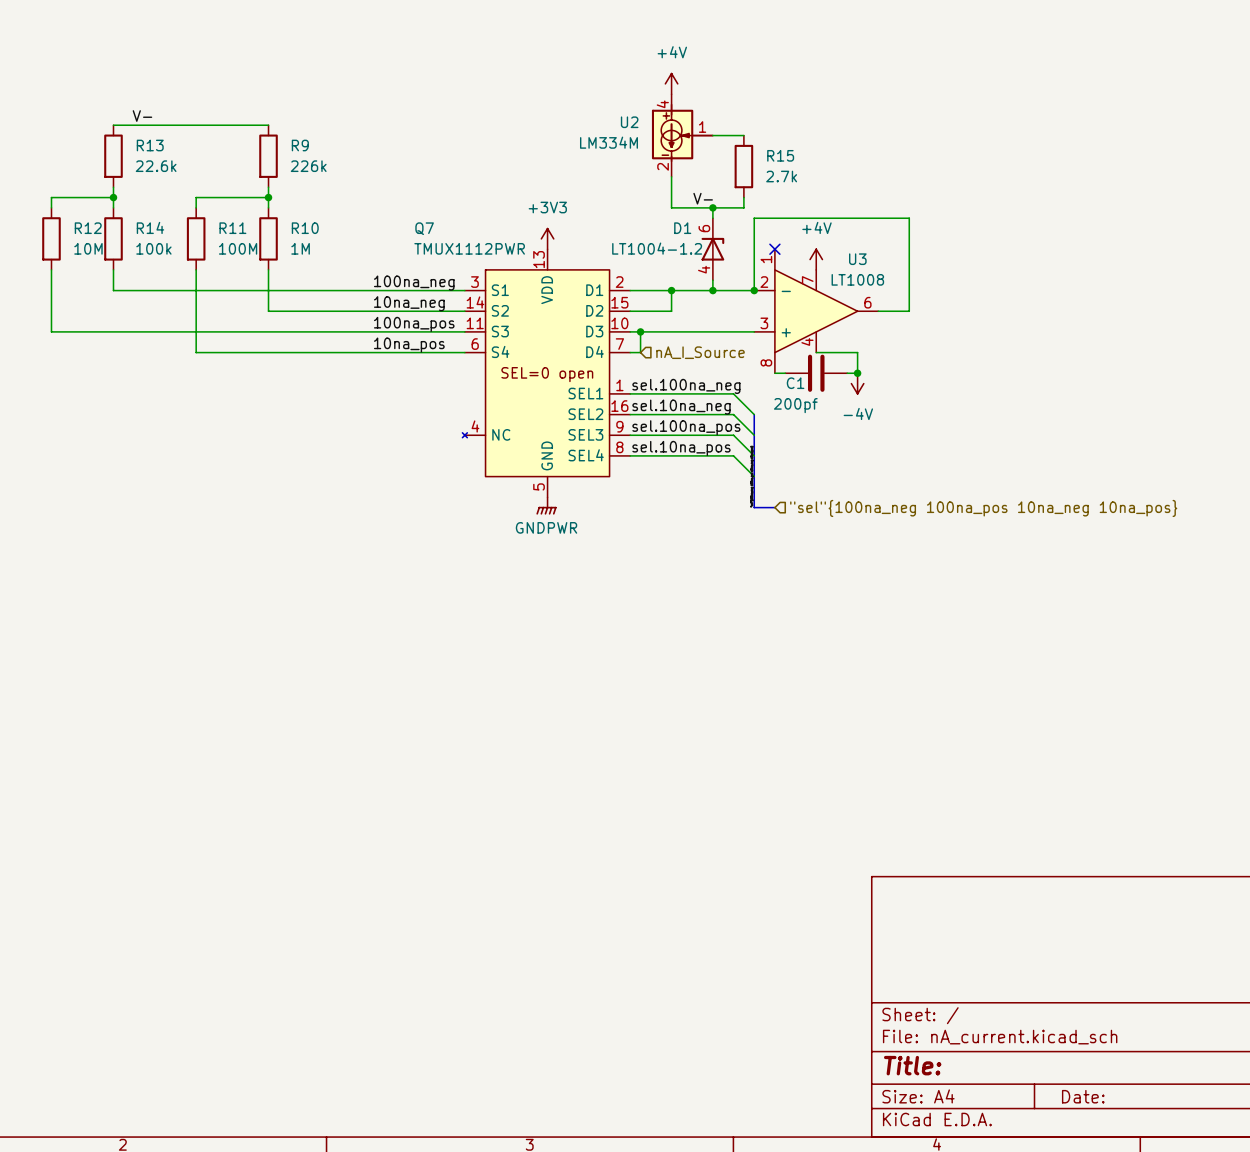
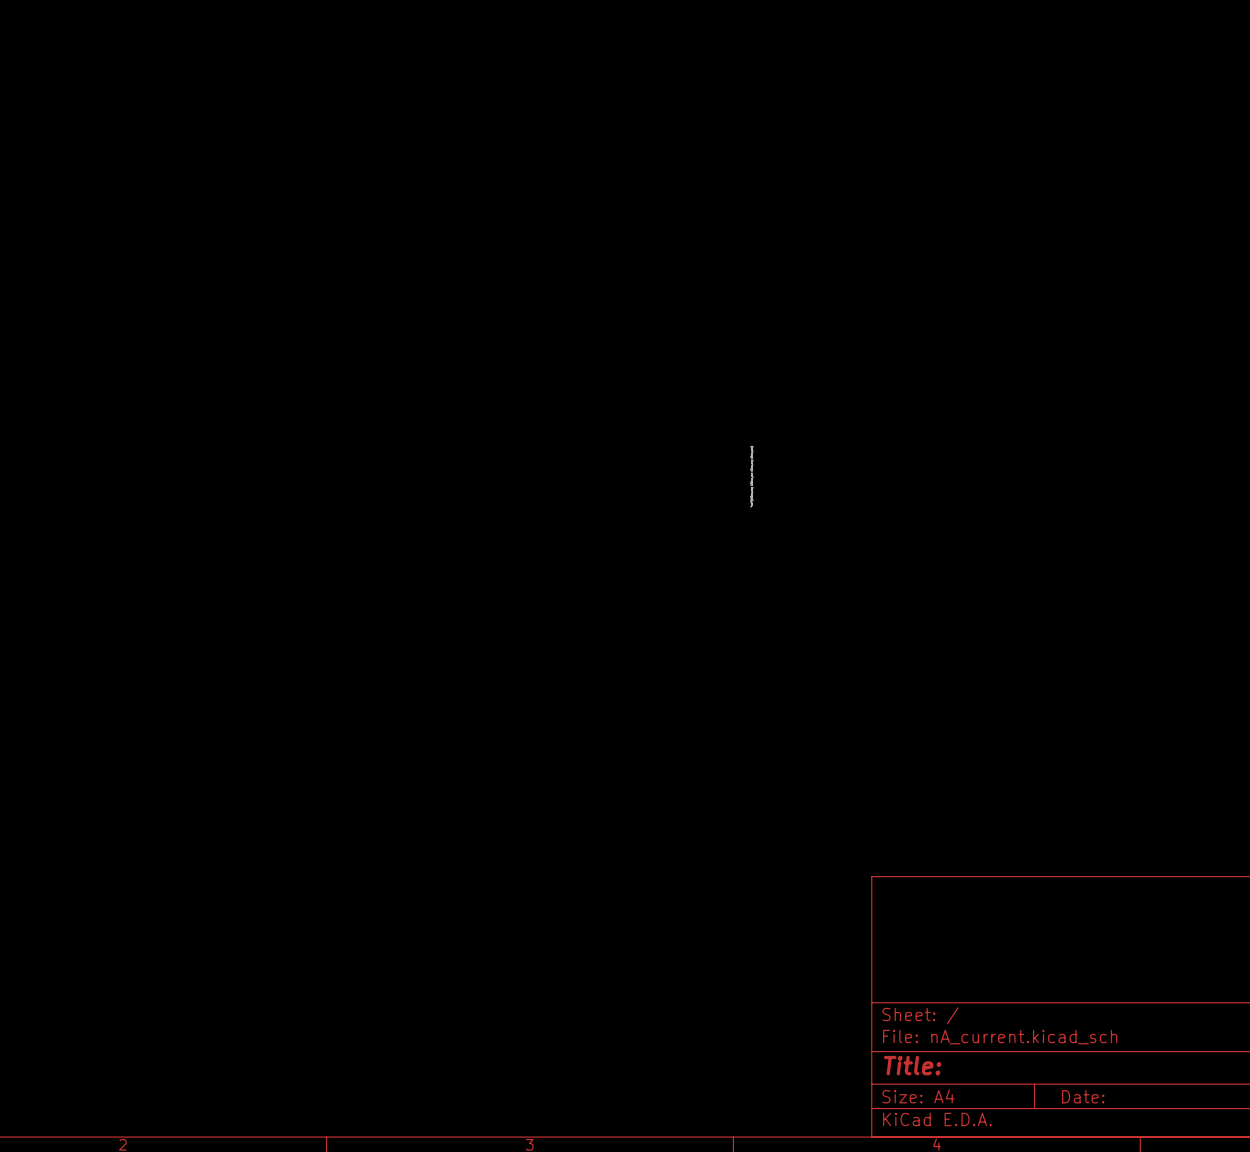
power symbol: +4V (671, 83) -> none
label: V- (142, 116) -> none
wire: (113, 125) (268, 125) -> none
U2: LM334M (682, 135) -> none
wire: (712, 135) (743, 135) -> none
R13: 22.6k (113, 156) -> none
R9: 226k (268, 156) -> none
R15: 2.7k (743, 166) -> none
wire: (671, 176) (671, 207) (743, 207) (743, 197) -> none
wire: (113, 187) (113, 207) -> none
wire: (268, 187) (268, 207) -> none
wire: (113, 197) (51, 197) (51, 207) -> none
junction: (113, 197) -> none
wire: (268, 197) (196, 197) (196, 207) -> none
junction: (268, 197) -> none
label: V- (703, 198) -> none
wire: (712, 207) (712, 218) -> none
junction: (712, 207) -> none
R12: 10M (51, 238) -> none
R14: 100k (113, 238) -> none
R11: 100M (196, 238) -> none
R10: 1M (268, 238) -> none
power symbol: +3V3 (547, 238) -> none
D1: LT1004-1.2 (712, 249) -> none
no-connect mark: (774, 249) -> none
power symbol: +4V (816, 259) -> none
wire: (51, 269) (51, 331) (464, 331) -> none
wire: (113, 269) (113, 290) (464, 290) -> none
wire: (196, 269) (196, 352) (464, 352) -> none
wire: (268, 269) (268, 311) (464, 311) -> none
wire: (712, 280) (712, 290) -> none
label: 100na_neg (414, 283) -> none
wire: (630, 290) (754, 290) (754, 218) (909, 218) (909, 311) (878, 311) -> none
wire: (671, 290) (671, 311) (630, 311) -> none
junction: (671, 290) -> none
junction: (712, 290) -> none
junction: (754, 290) -> none
label: 10na_neg (409, 303) -> none
U3: LT1008 (816, 311) -> none
label: 100na_pos (414, 324) -> none
wire: (630, 331) (754, 331) -> none
wire: (640, 331) (640, 352) (630, 352) -> none
junction: (640, 331) -> none
label: 10na_pos (409, 345) -> none
hierarchical label: nA_I_Source (700, 352) -> none
wire: (816, 352) (857, 352) (857, 373) (847, 373) -> none
Q7: TMUX1112PWR (546, 373) -> none
wire: (774, 373) (785, 373) -> none
C1: 200pf (816, 373) -> none
junction: (857, 373) -> none
power symbol: -4V (857, 383) -> none
label: sel.100na_neg (686, 386) -> none
wire: (630, 393) (733, 393) (754, 414) -> none
label: sel.10na_neg (681, 407) -> none
wire: (630, 414) (733, 414) (754, 435) -> none
bus: (754, 414) (754, 507) (774, 507) -> none
label: sel.100na_pos (686, 427) -> none
wire: (630, 435) (733, 435) (754, 455) -> none
label: sel.10na_pos (681, 448) -> none
wire: (630, 455) (733, 455) (754, 476) -> none
power symbol: GNDPWR (546, 505) -> none
hierarchical label: "sel"{100na_neg 100na_pos 10na_neg 10na_pos} (983, 508) -> none

